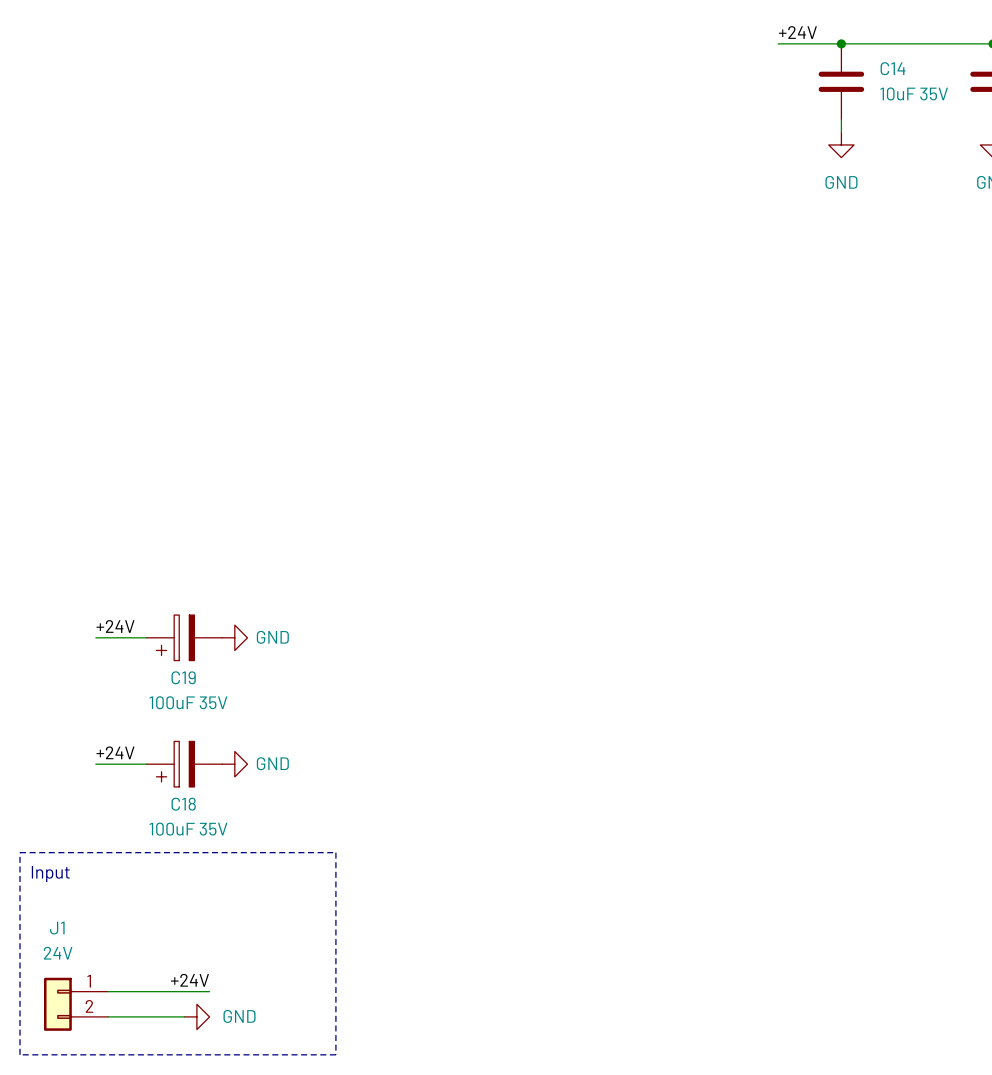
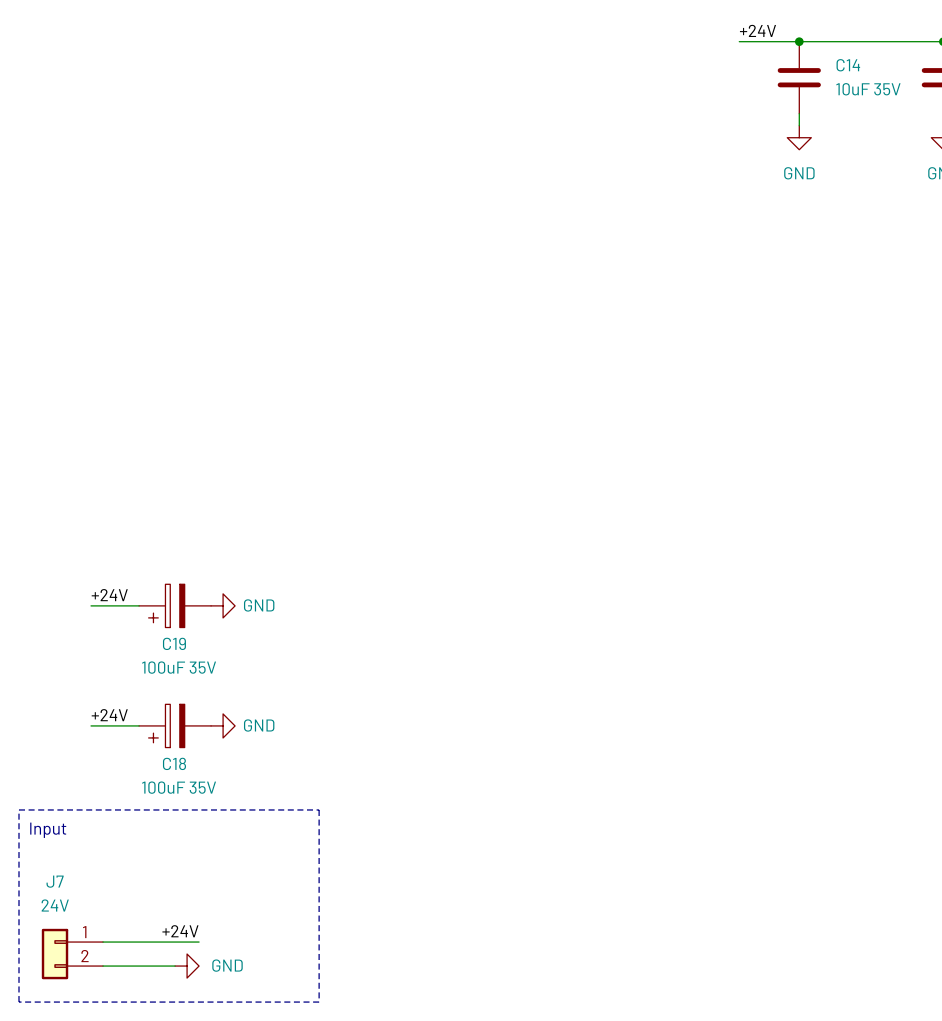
J1 name: J1 (57, 928) -> J7 (55, 881)

